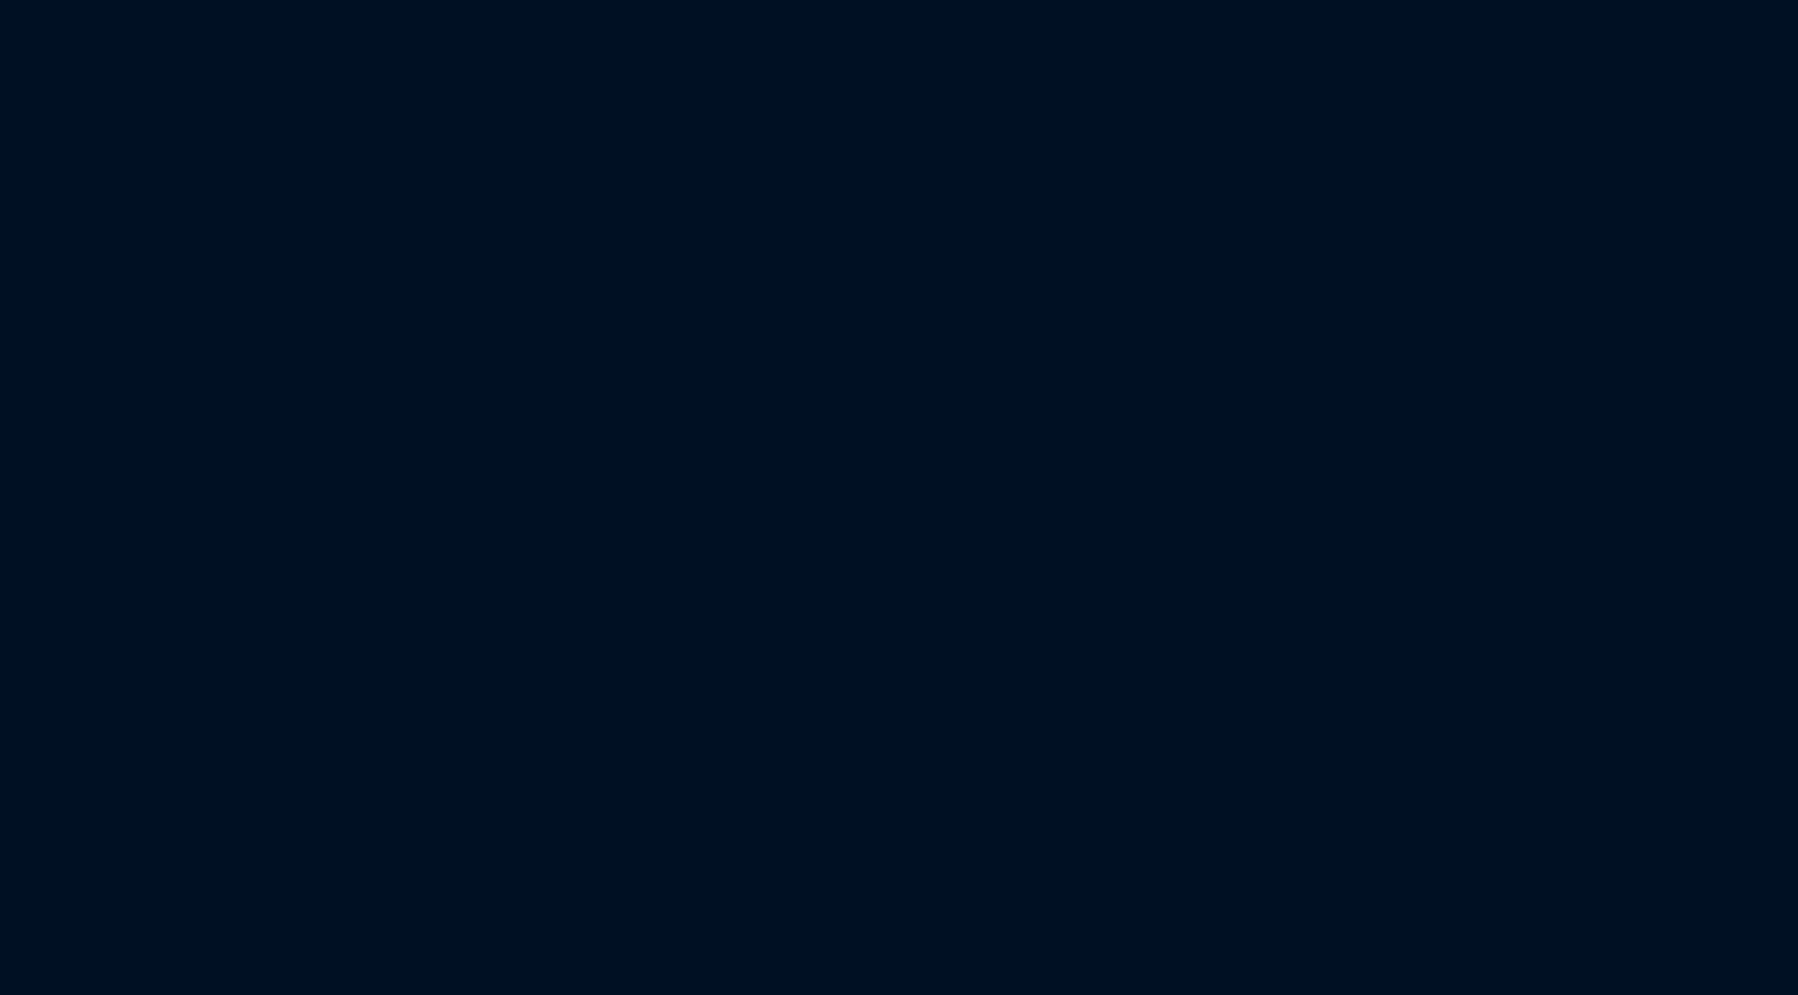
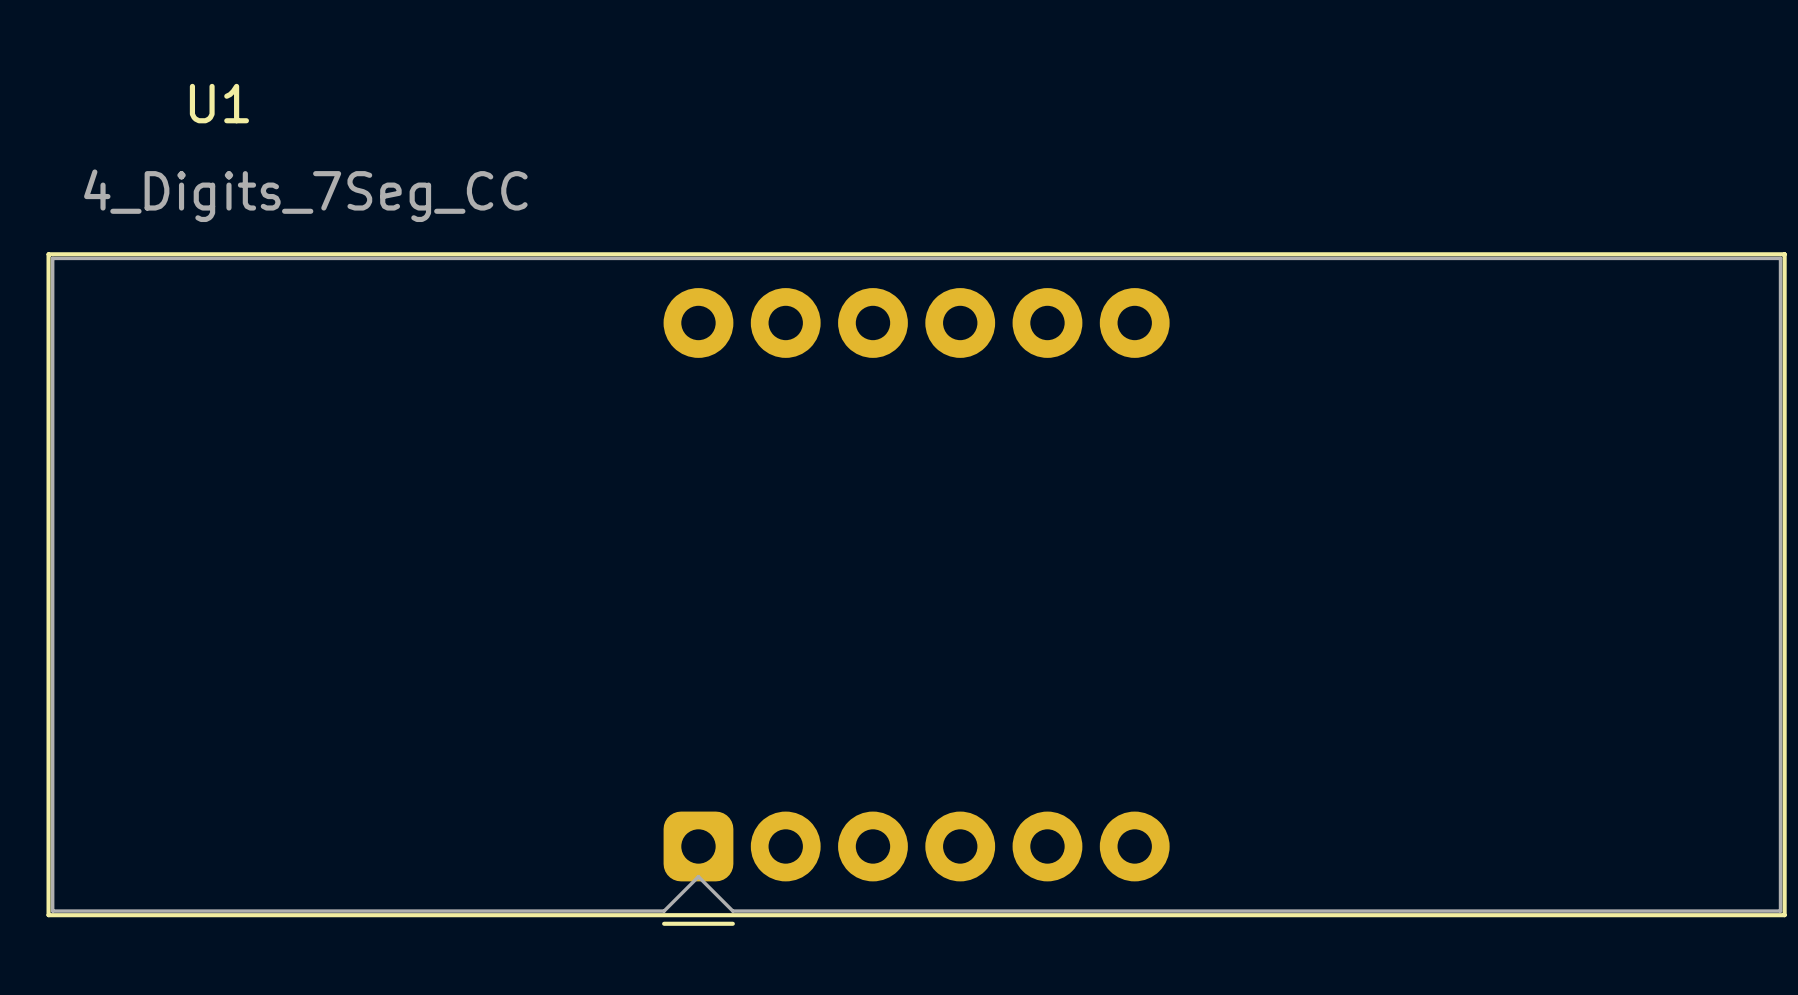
U1: none -> 4_Digits_7Seg_CC (916, 589)

